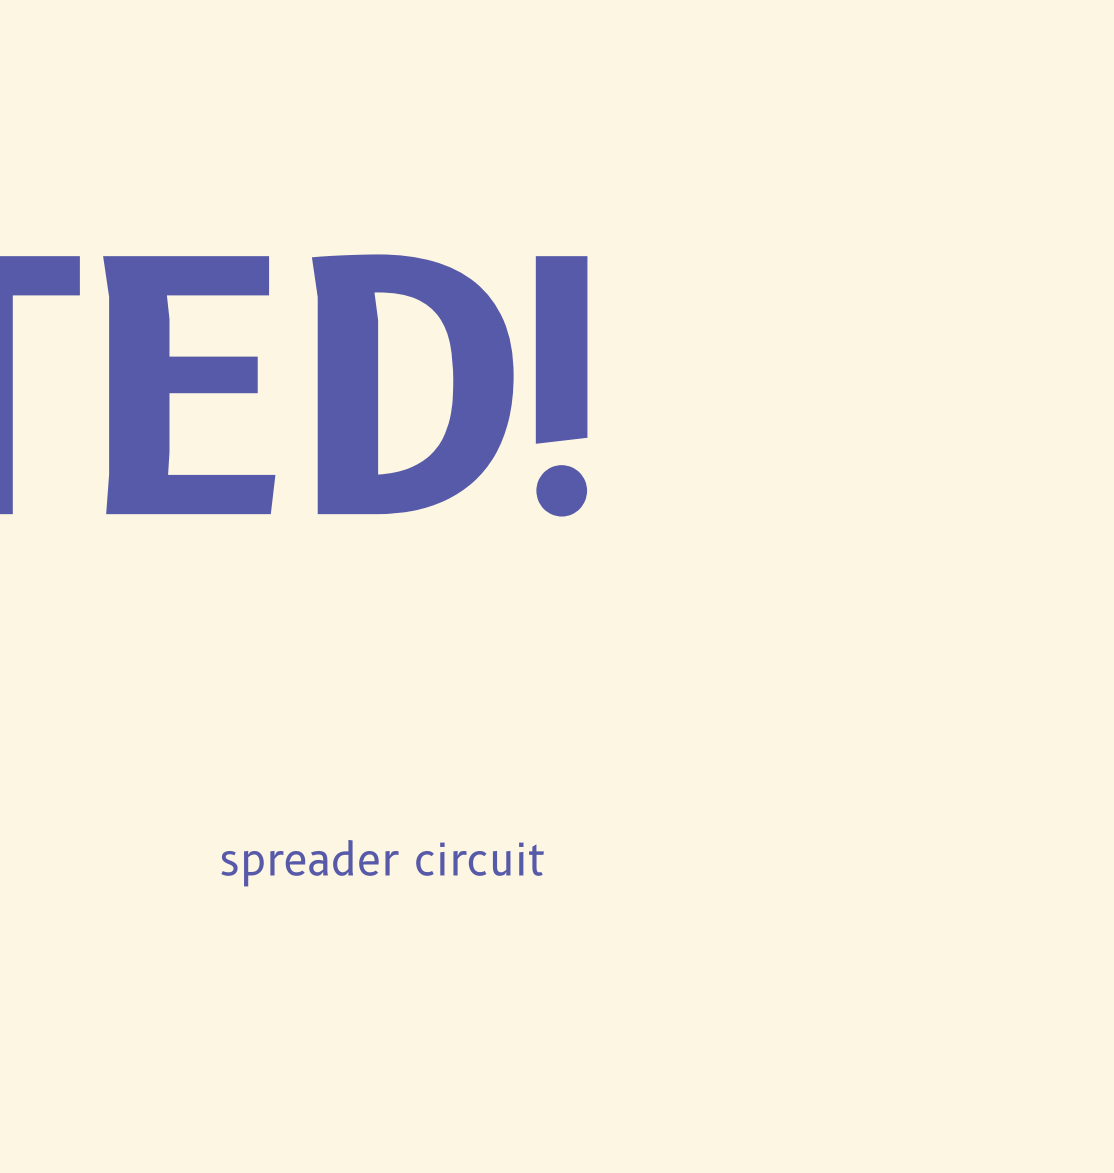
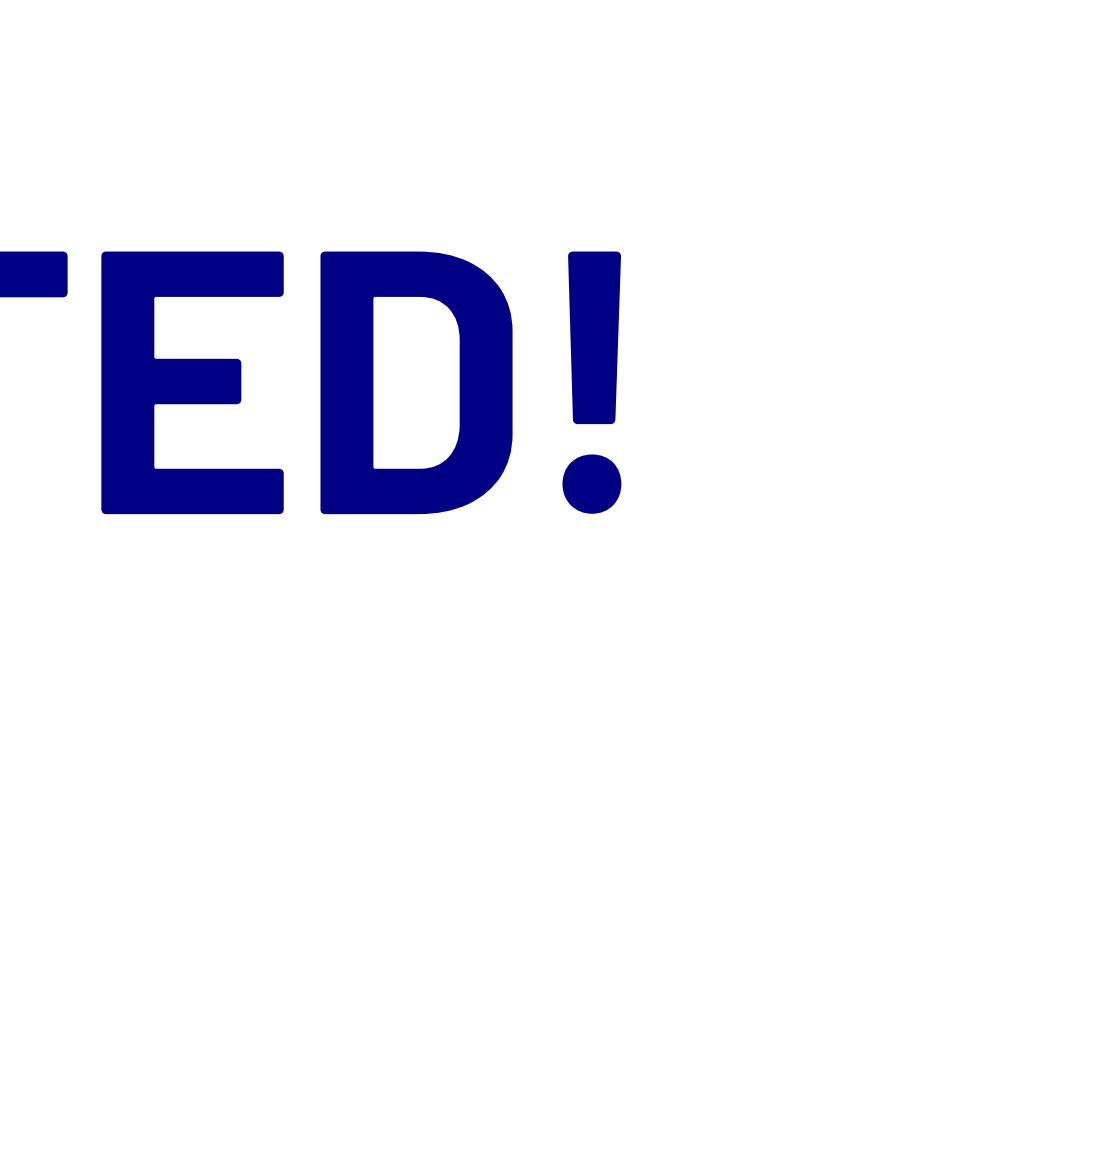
text: spreader circuit (382, 863) -> none

